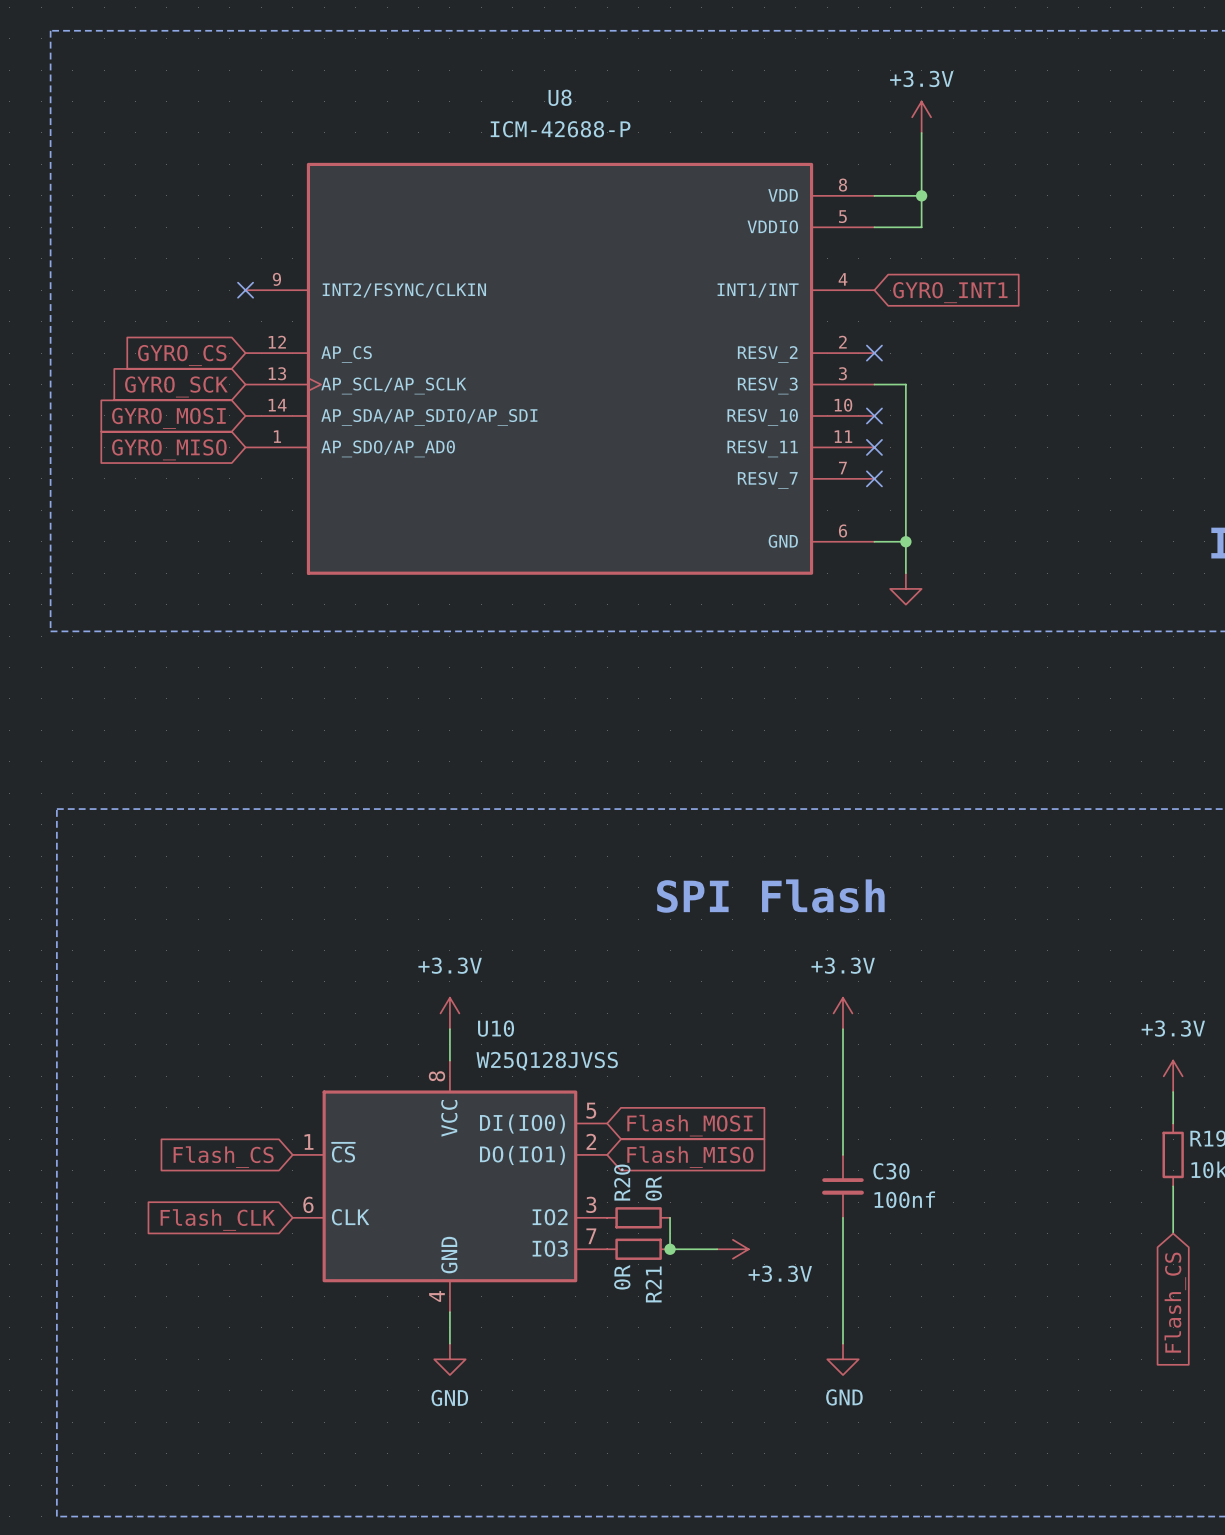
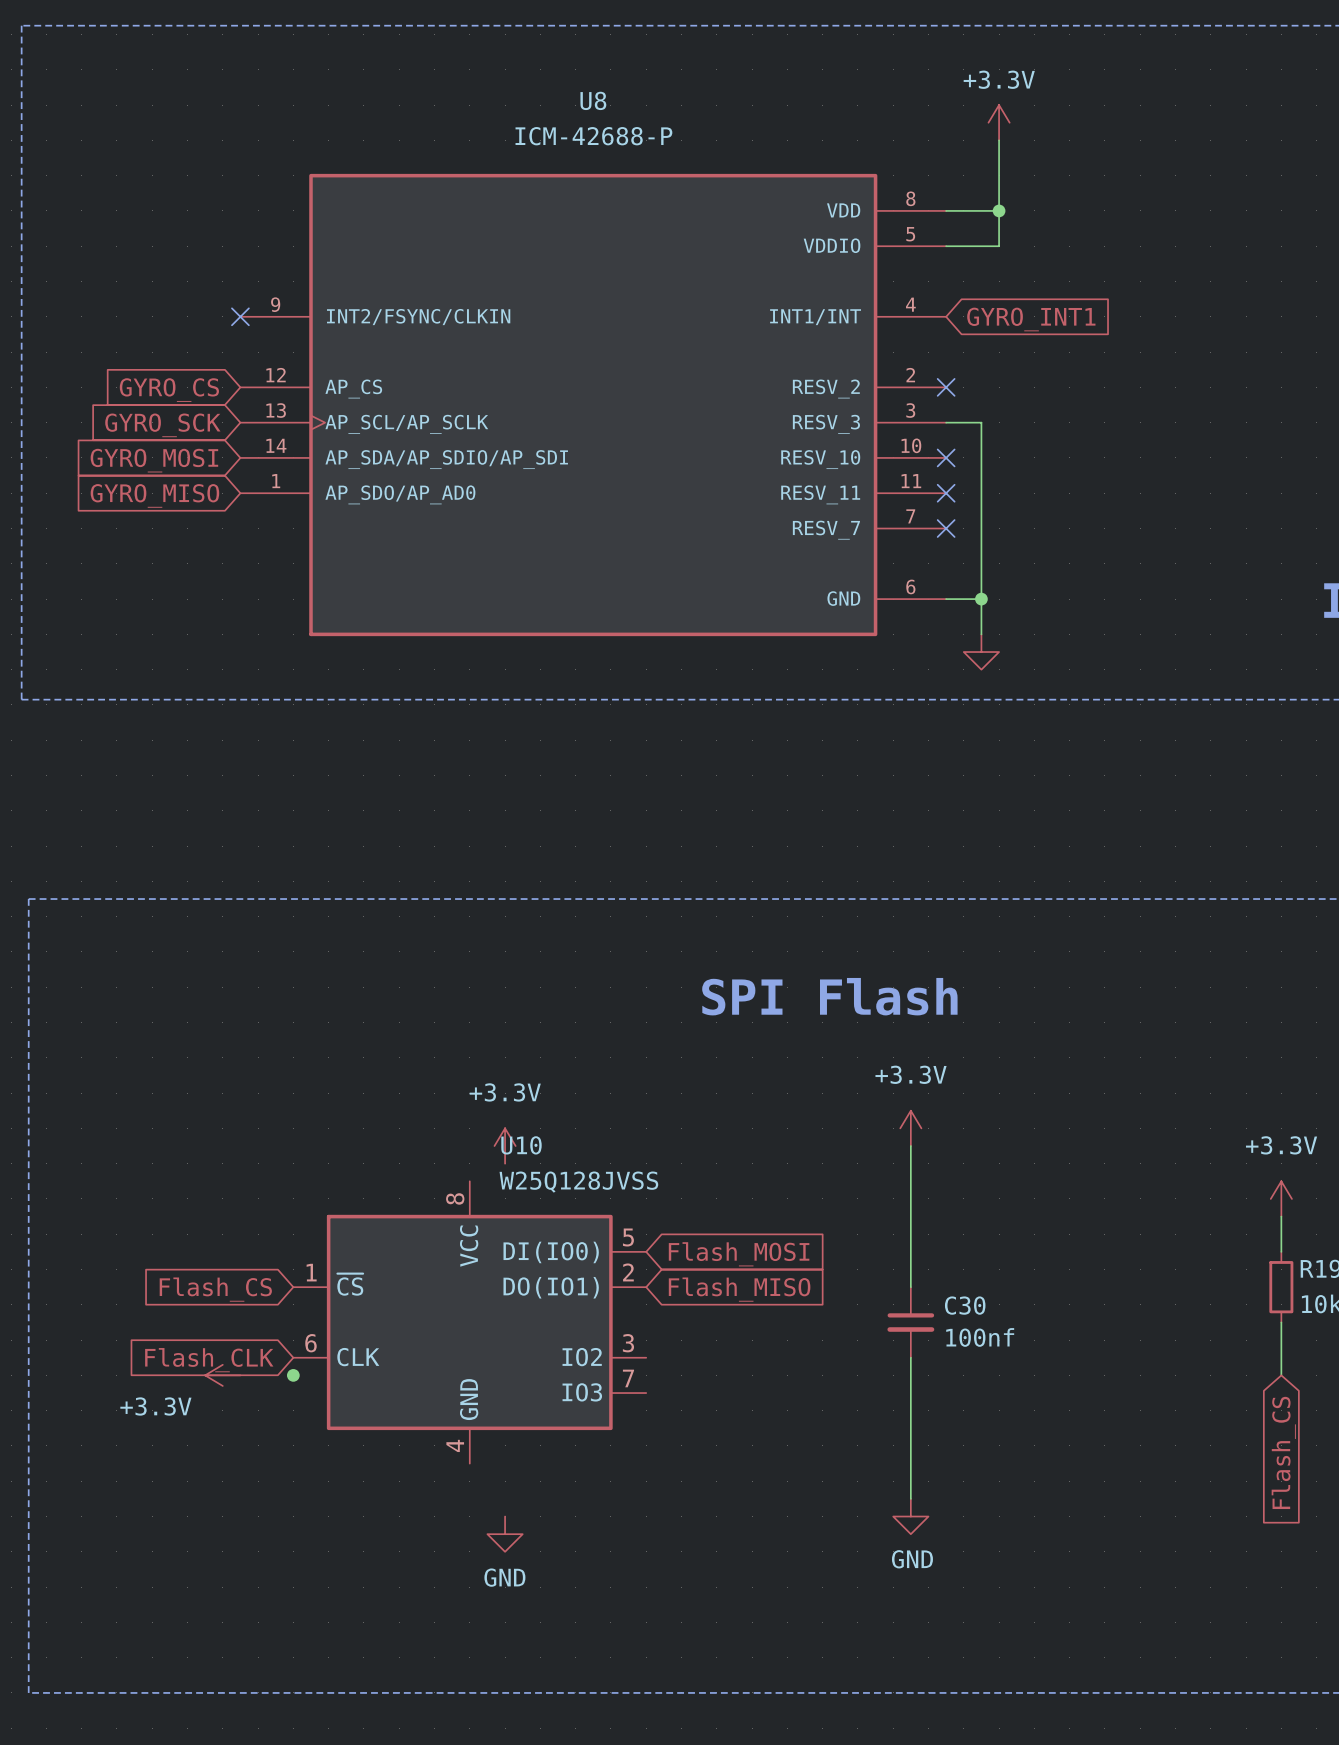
power symbol position: +3.3V (449, 1013) -> +3.3V (505, 1146)
wire: (449, 1029) (449, 1060) -> none
R20: 0R (638, 1217) -> none
wire: (670, 1217) (670, 1249) (717, 1249) -> none
power symbol: none -> +3.3V (222, 1375)
junction: none -> (293, 1375)
R21: 0R (638, 1249) -> none
junction: (670, 1249) -> none
power symbol: +3.3V (732, 1249) -> none
wire: (449, 1312) (449, 1343) -> none
power symbol position: GND (449, 1359) -> GND (505, 1534)

